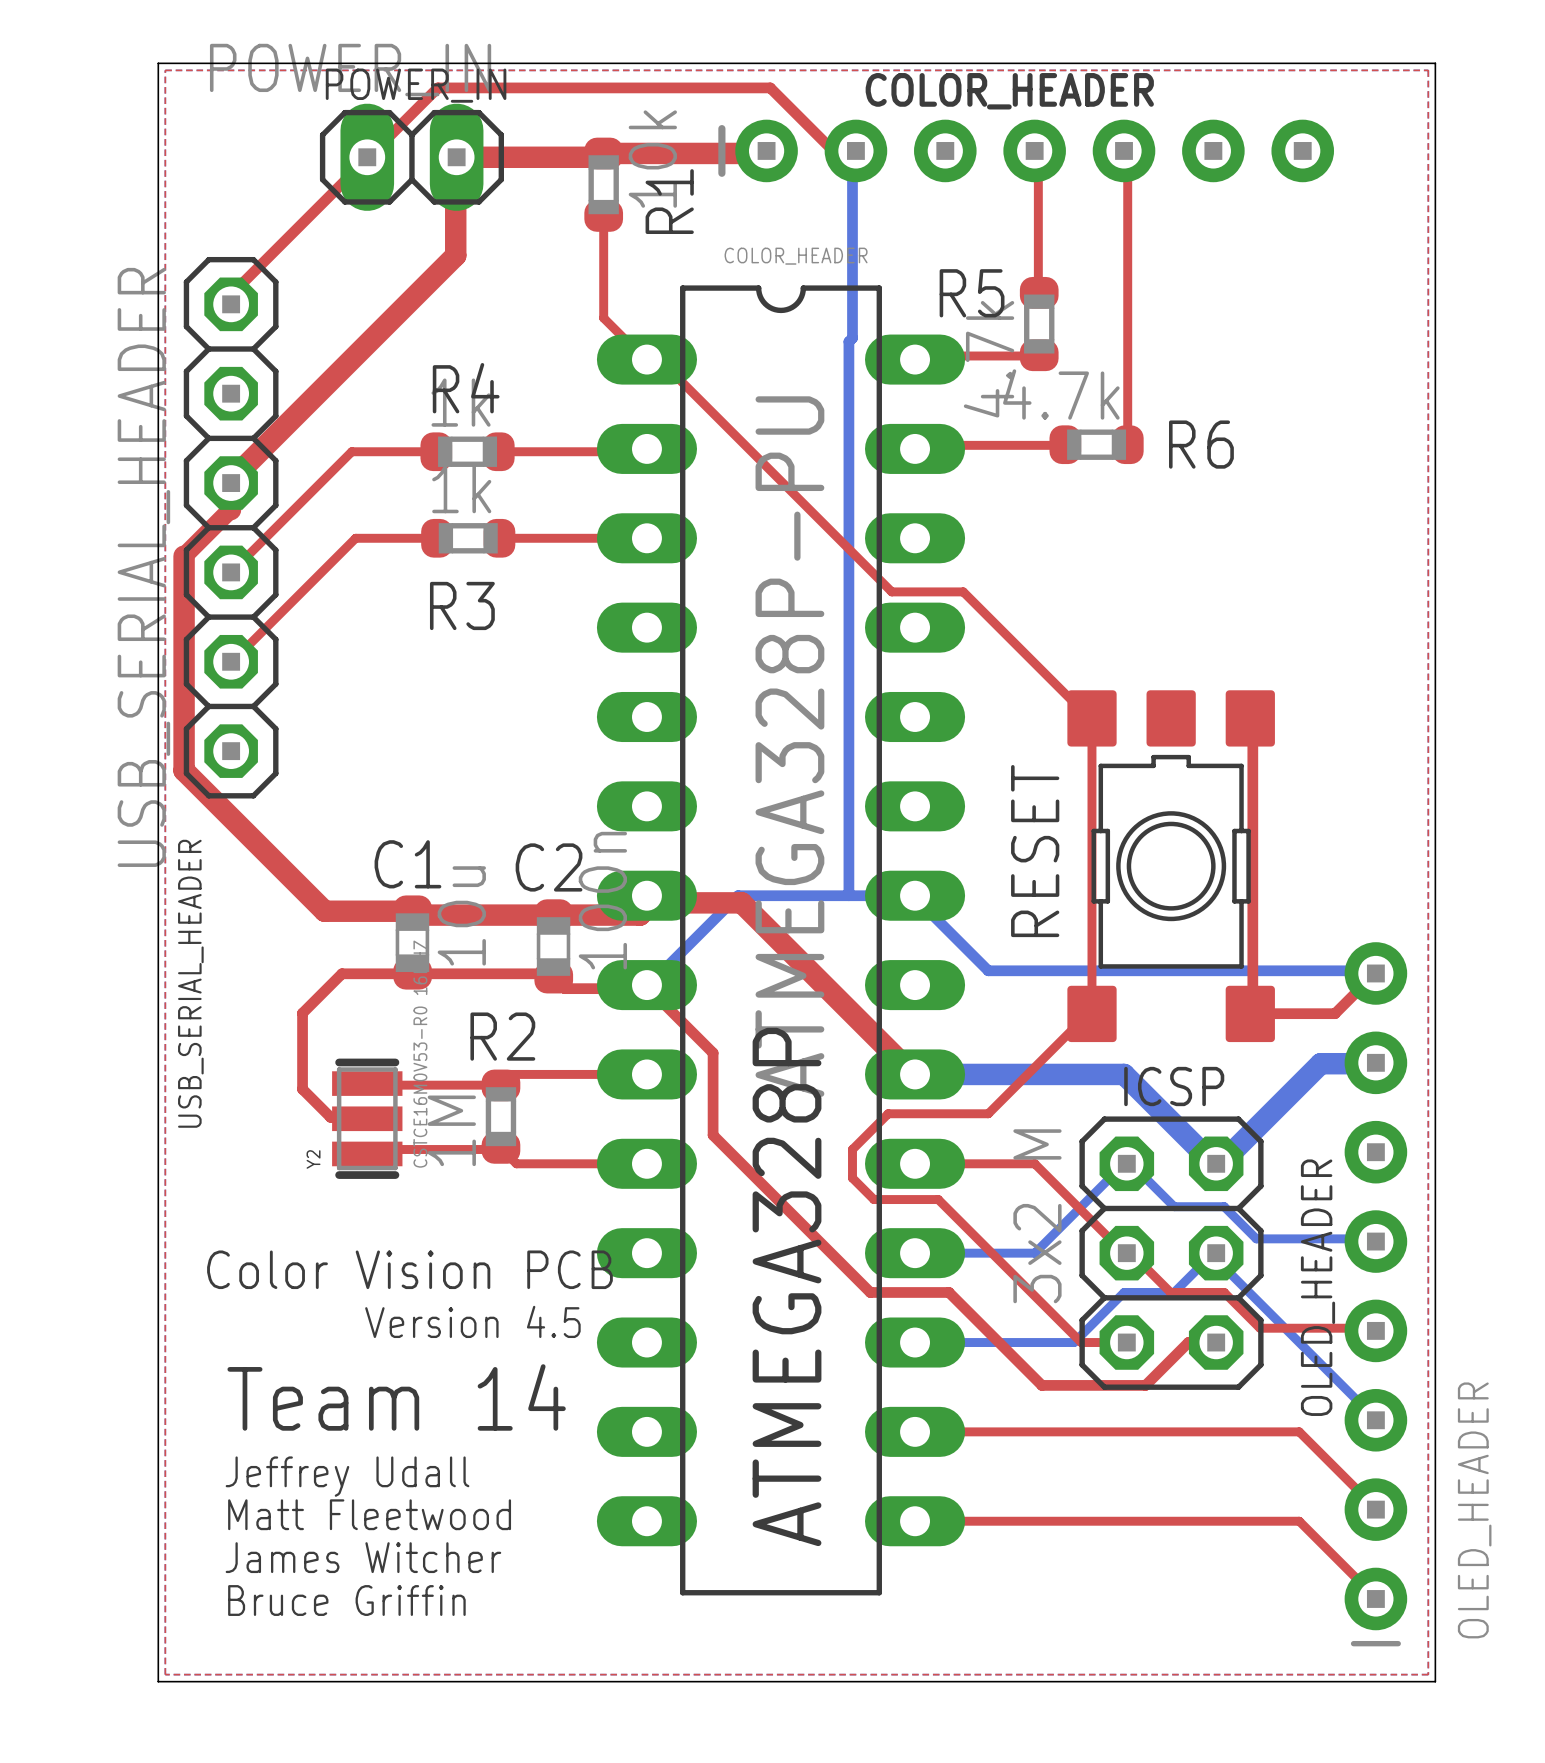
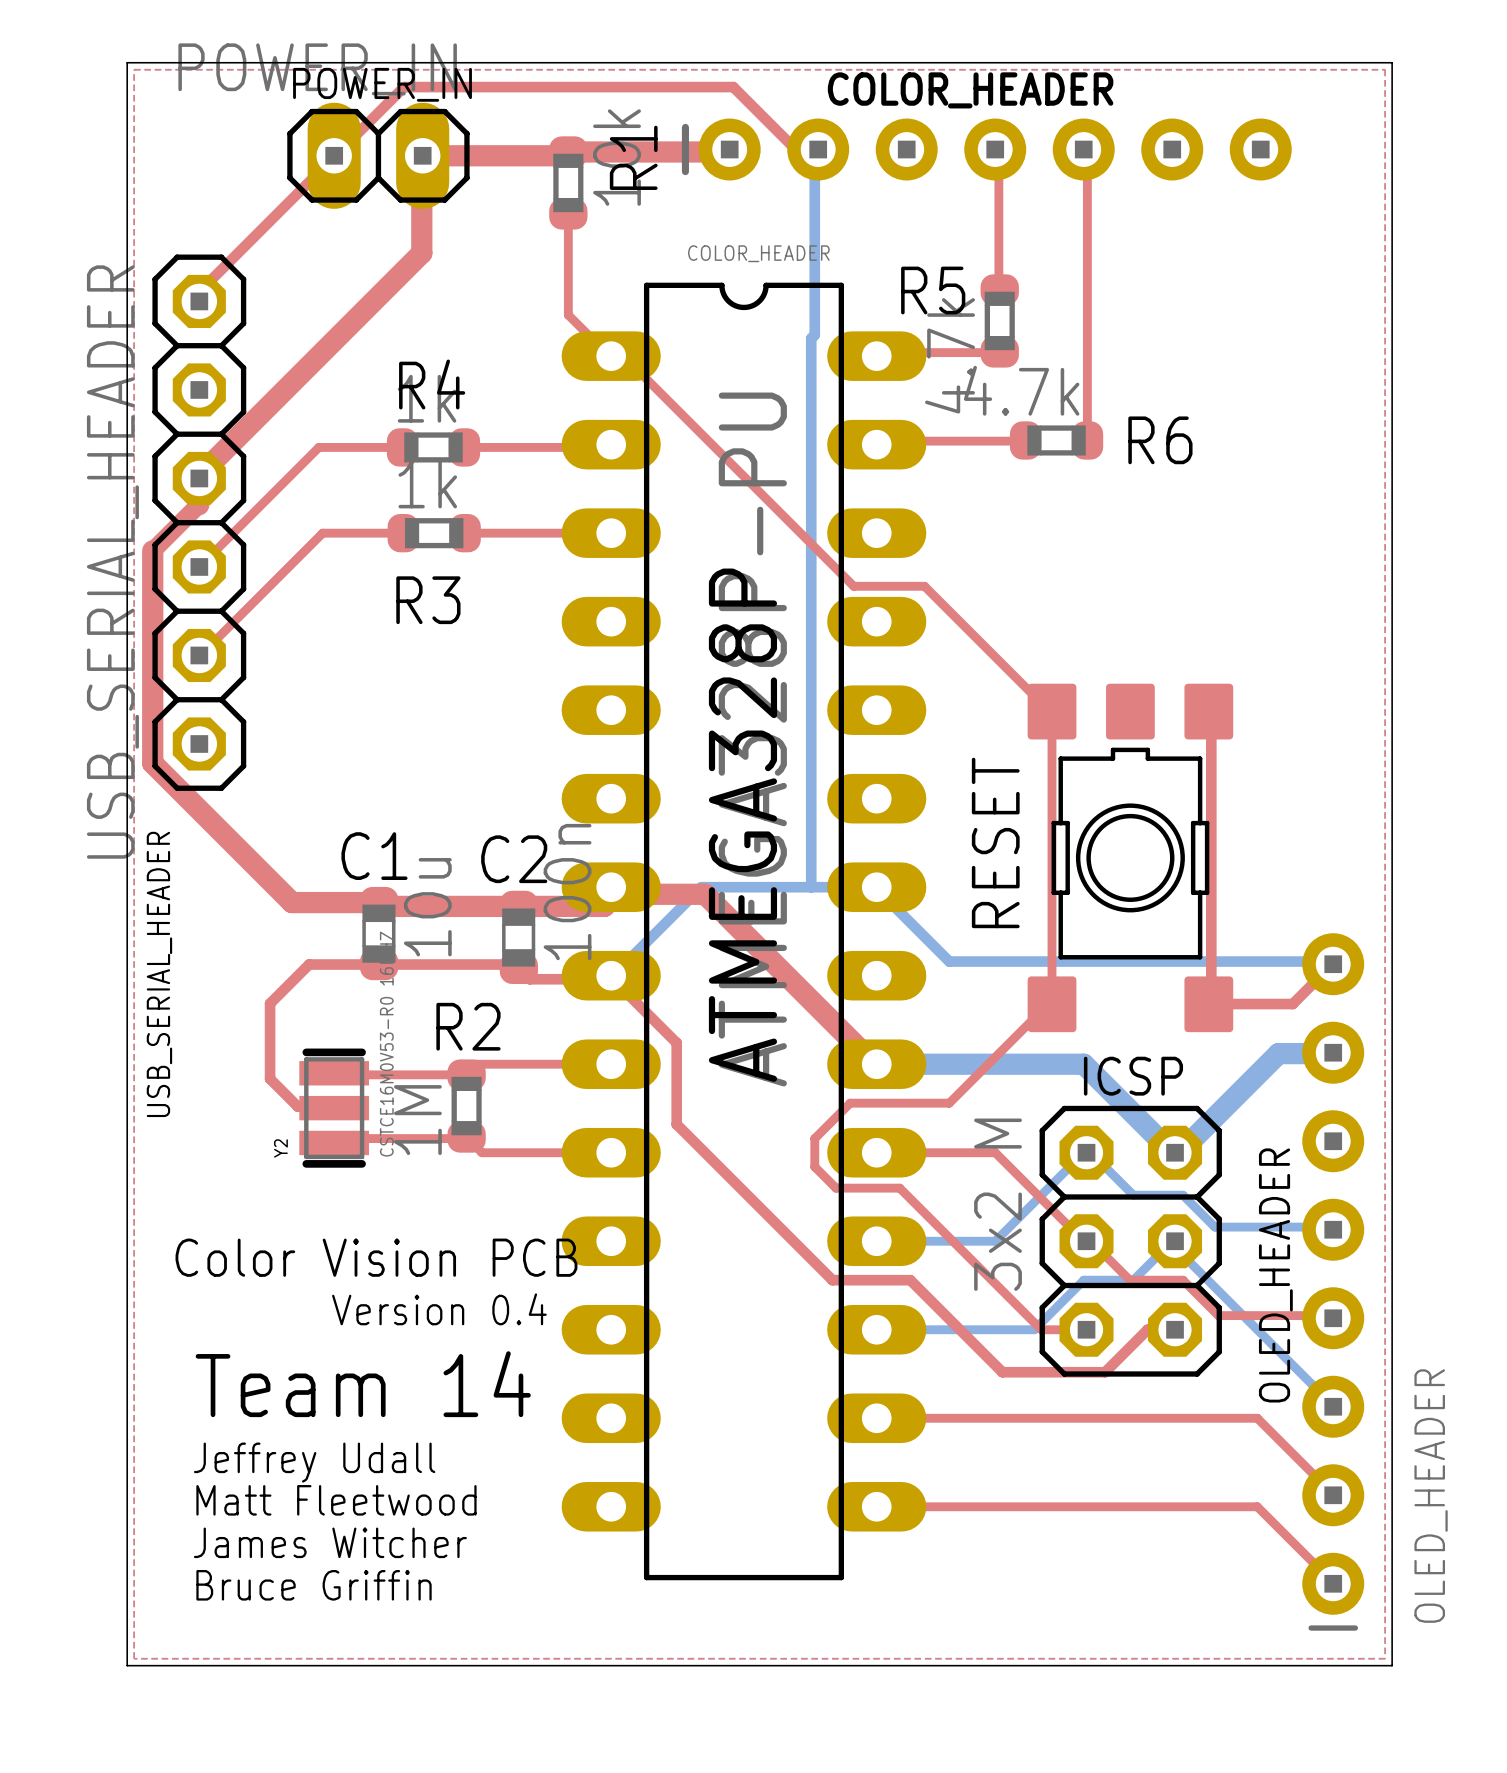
R1 name position: R1 (669, 201) -> R1 (633, 157)
ATMEGA328P name position: ATMEGA328P (787, 1286) -> ATMEGA328P (742, 825)
text: Version 4.5 (472, 1321) -> Version 0.4 (439, 1309)

